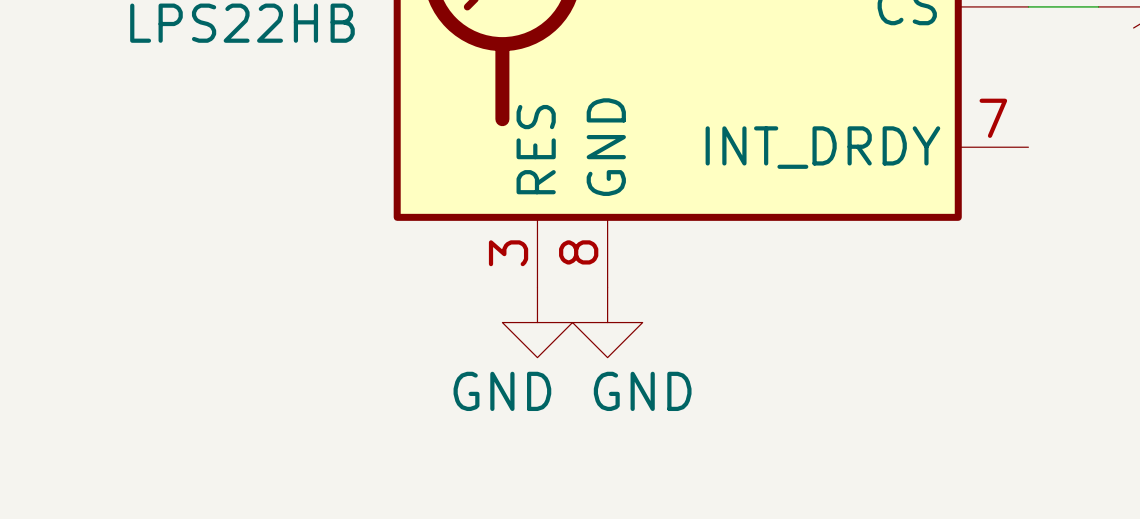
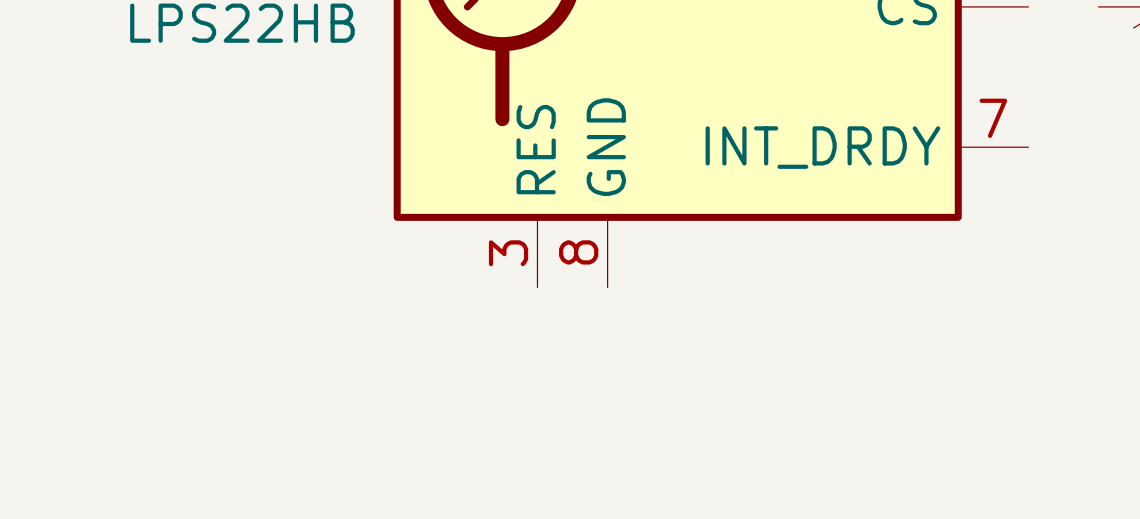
wire: (1028, 6) (1098, 6) -> none
power symbol: GND (537, 322) -> none
power symbol: GND (607, 322) -> none

